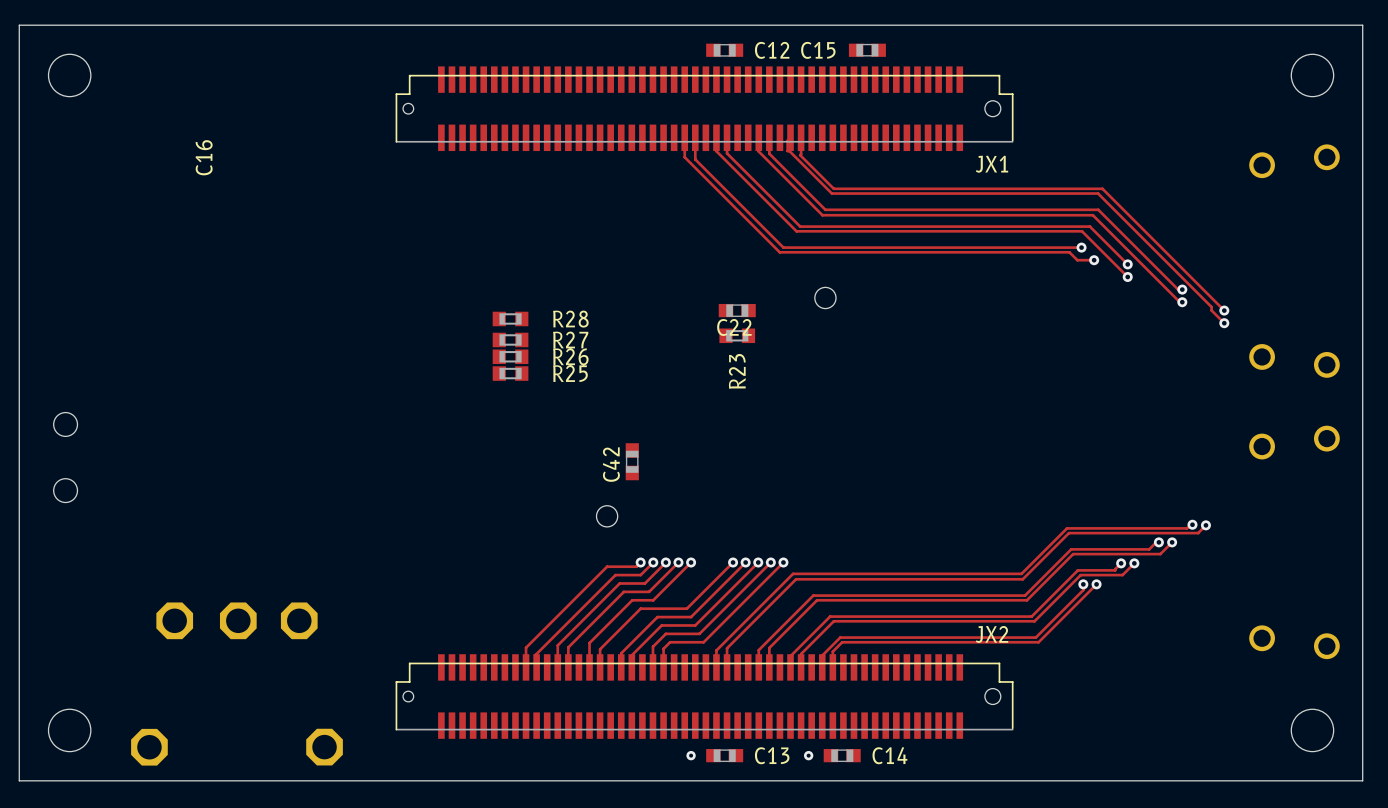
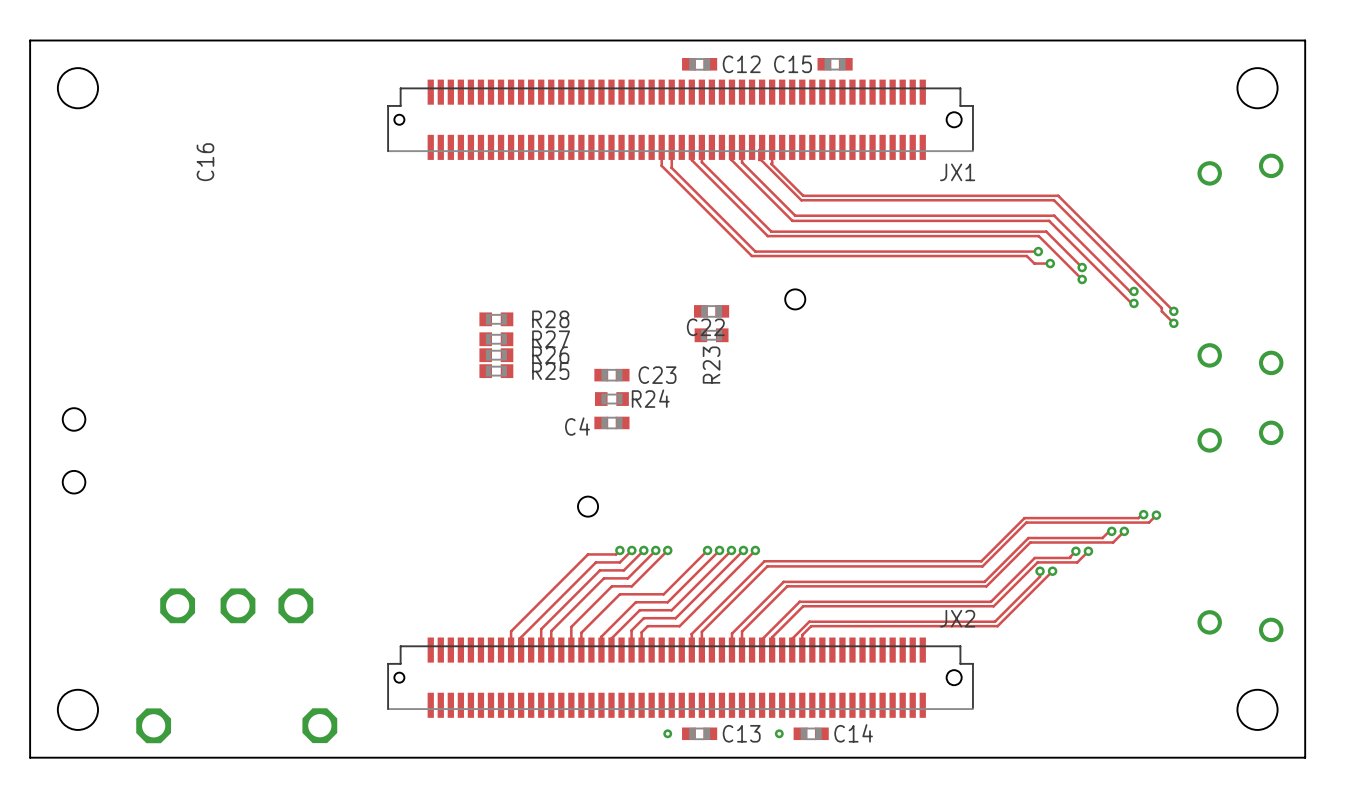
C23: none -> (611, 375)
R24: none -> (611, 399)
C4: none -> (611, 422)
C42: (632, 461) -> none

